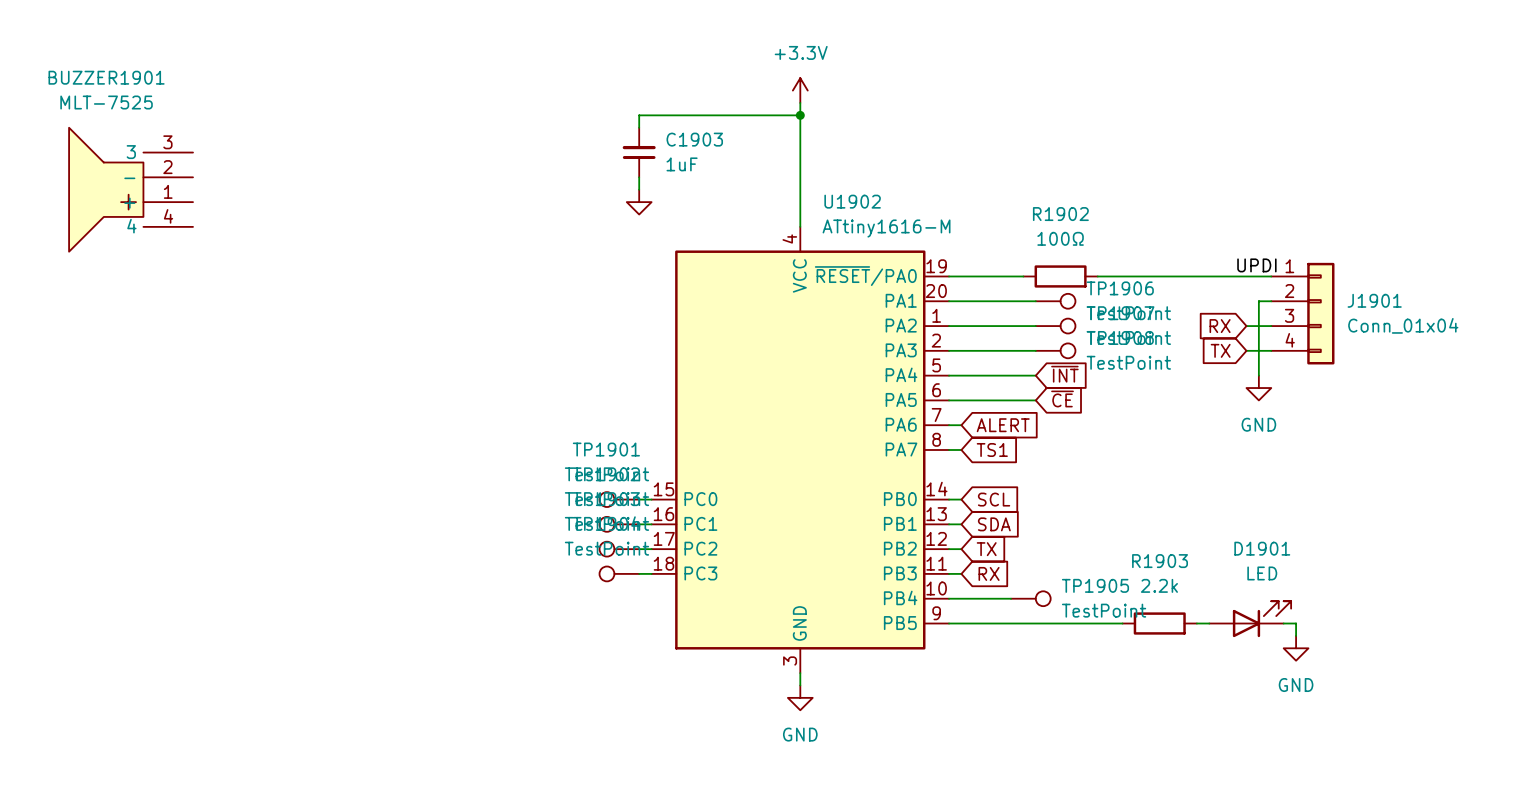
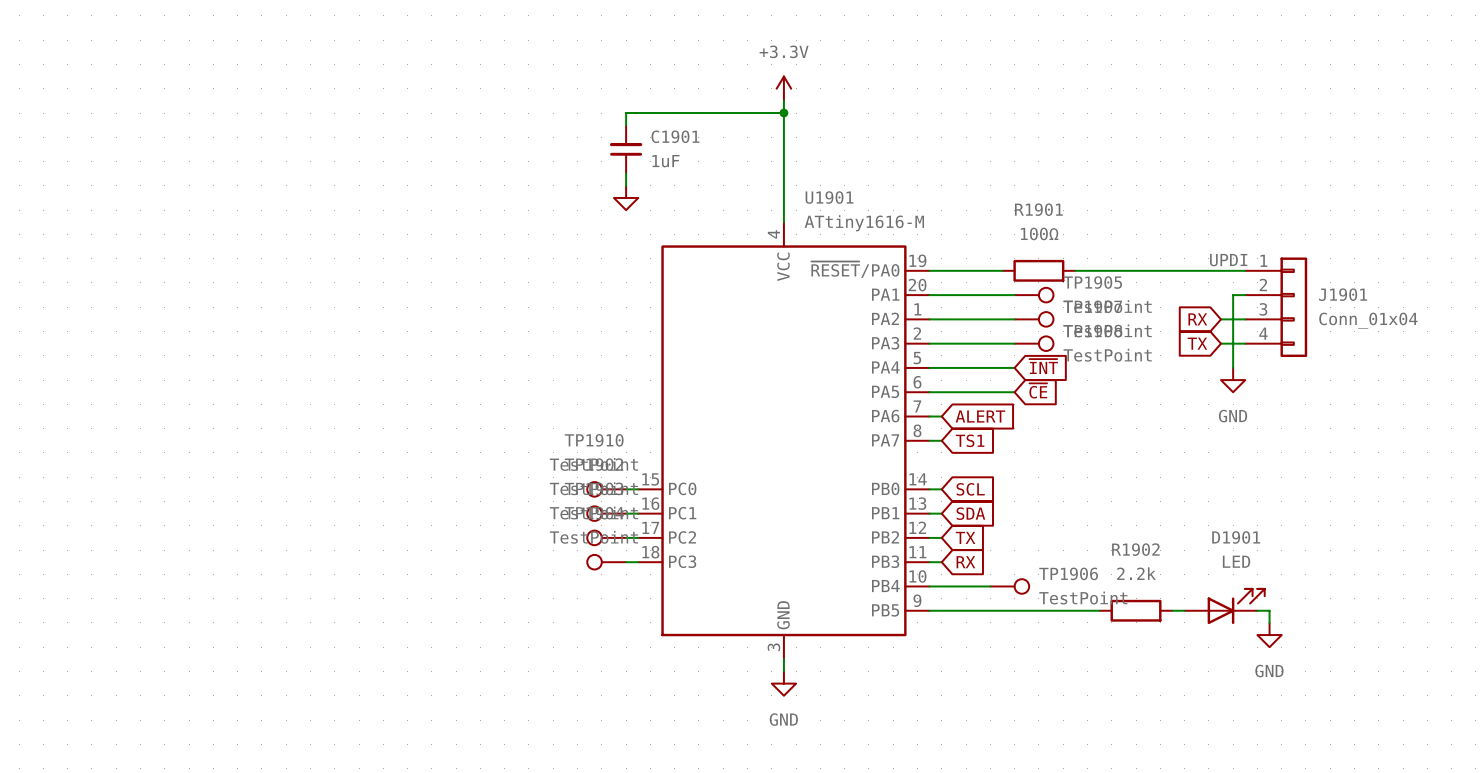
C1903 name: C1903 (694, 139) -> C1901 (675, 136)
BUZZER1901: MLT-7525 (131, 189) -> none
U1902 name: U1902 (852, 201) -> U1901 (829, 197)
R1902 name: R1902 (1060, 214) -> R1901 (1038, 209)
TP1906 name: TP1906 (1120, 288) -> TP1905 (1092, 282)
TP1901 name: TP1901 (606, 449) -> TP1910 (594, 440)
R1903 name: R1903 (1160, 561) -> R1902 (1135, 549)
TP1905 name: TP1905 (1095, 585) -> TP1906 (1068, 573)

